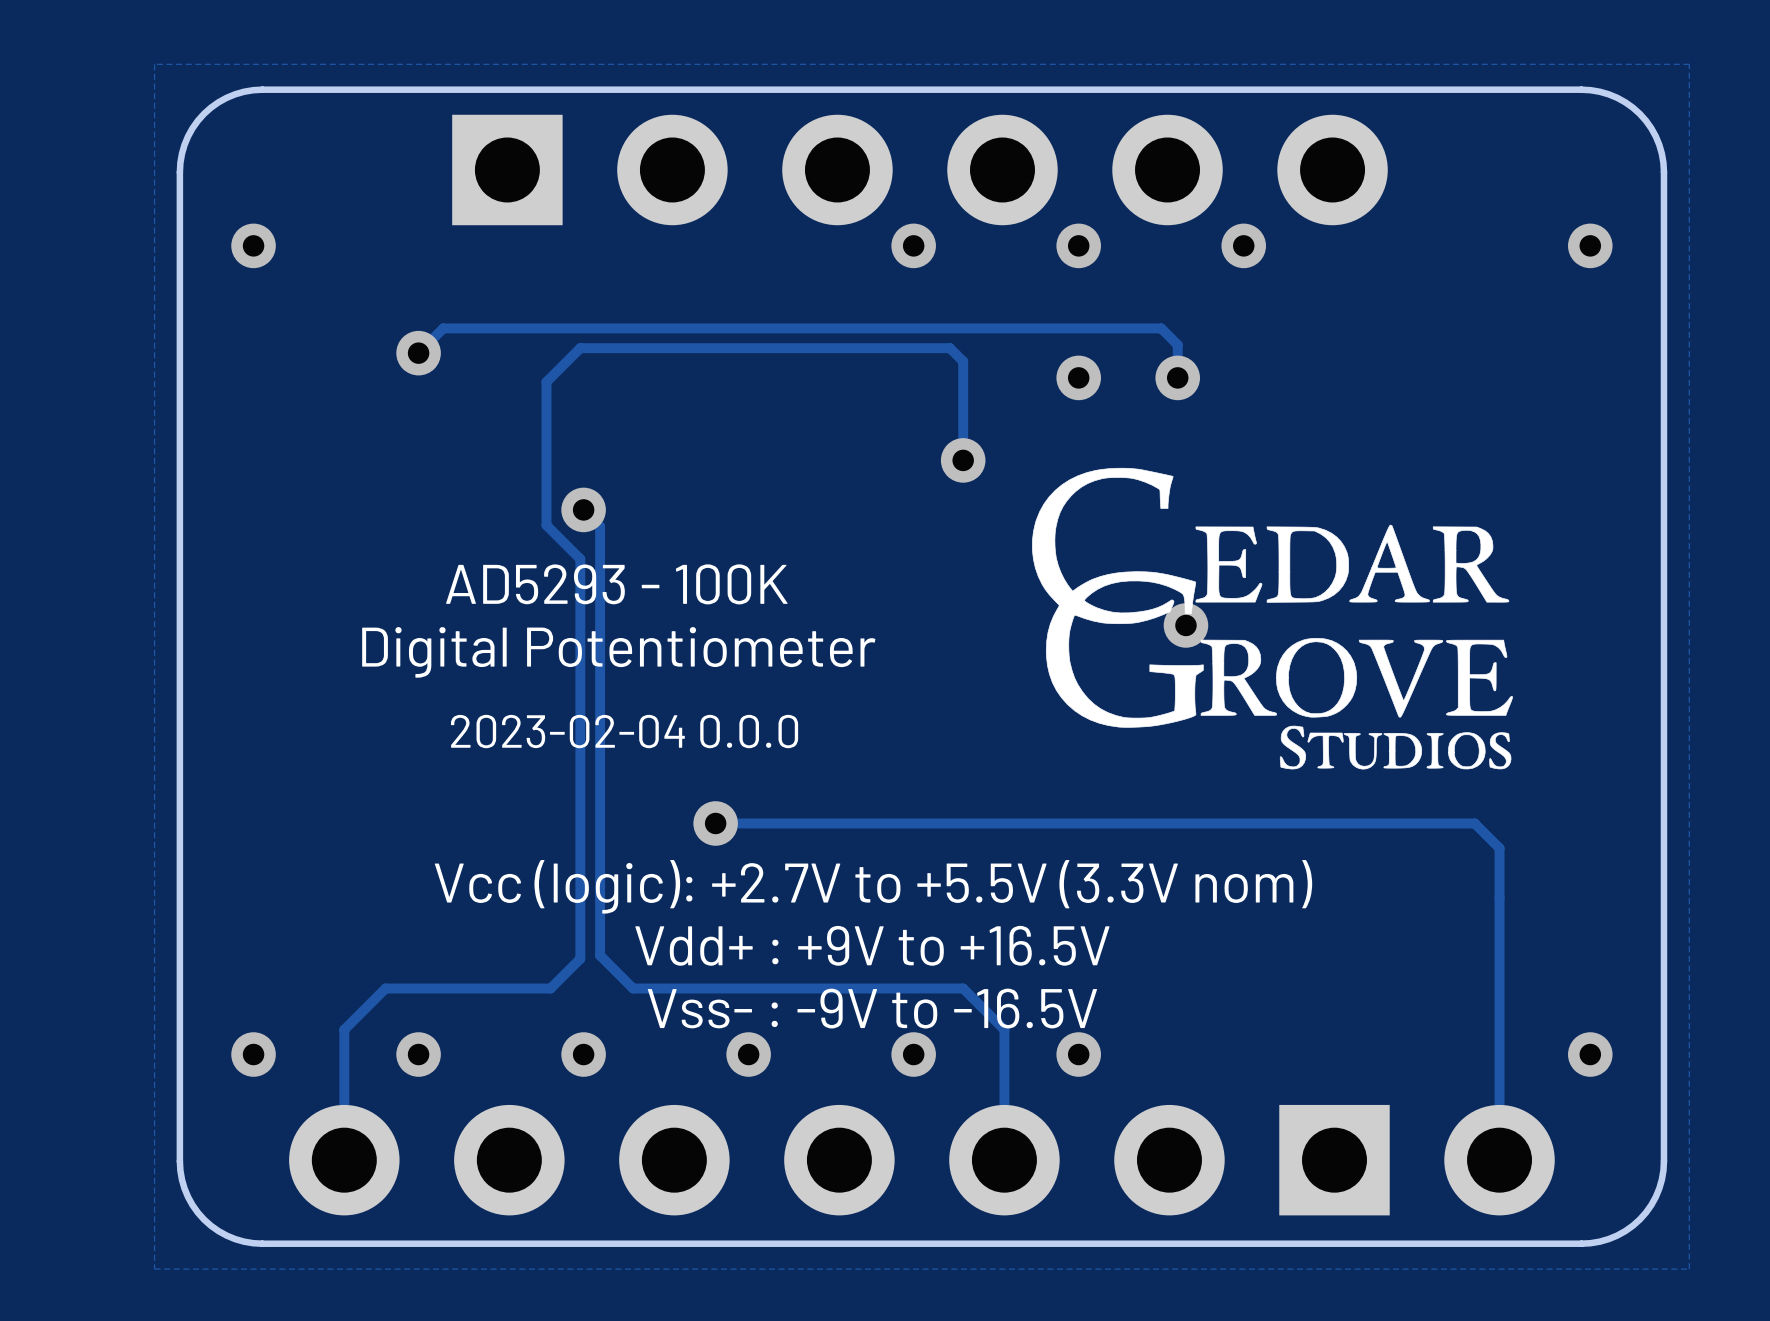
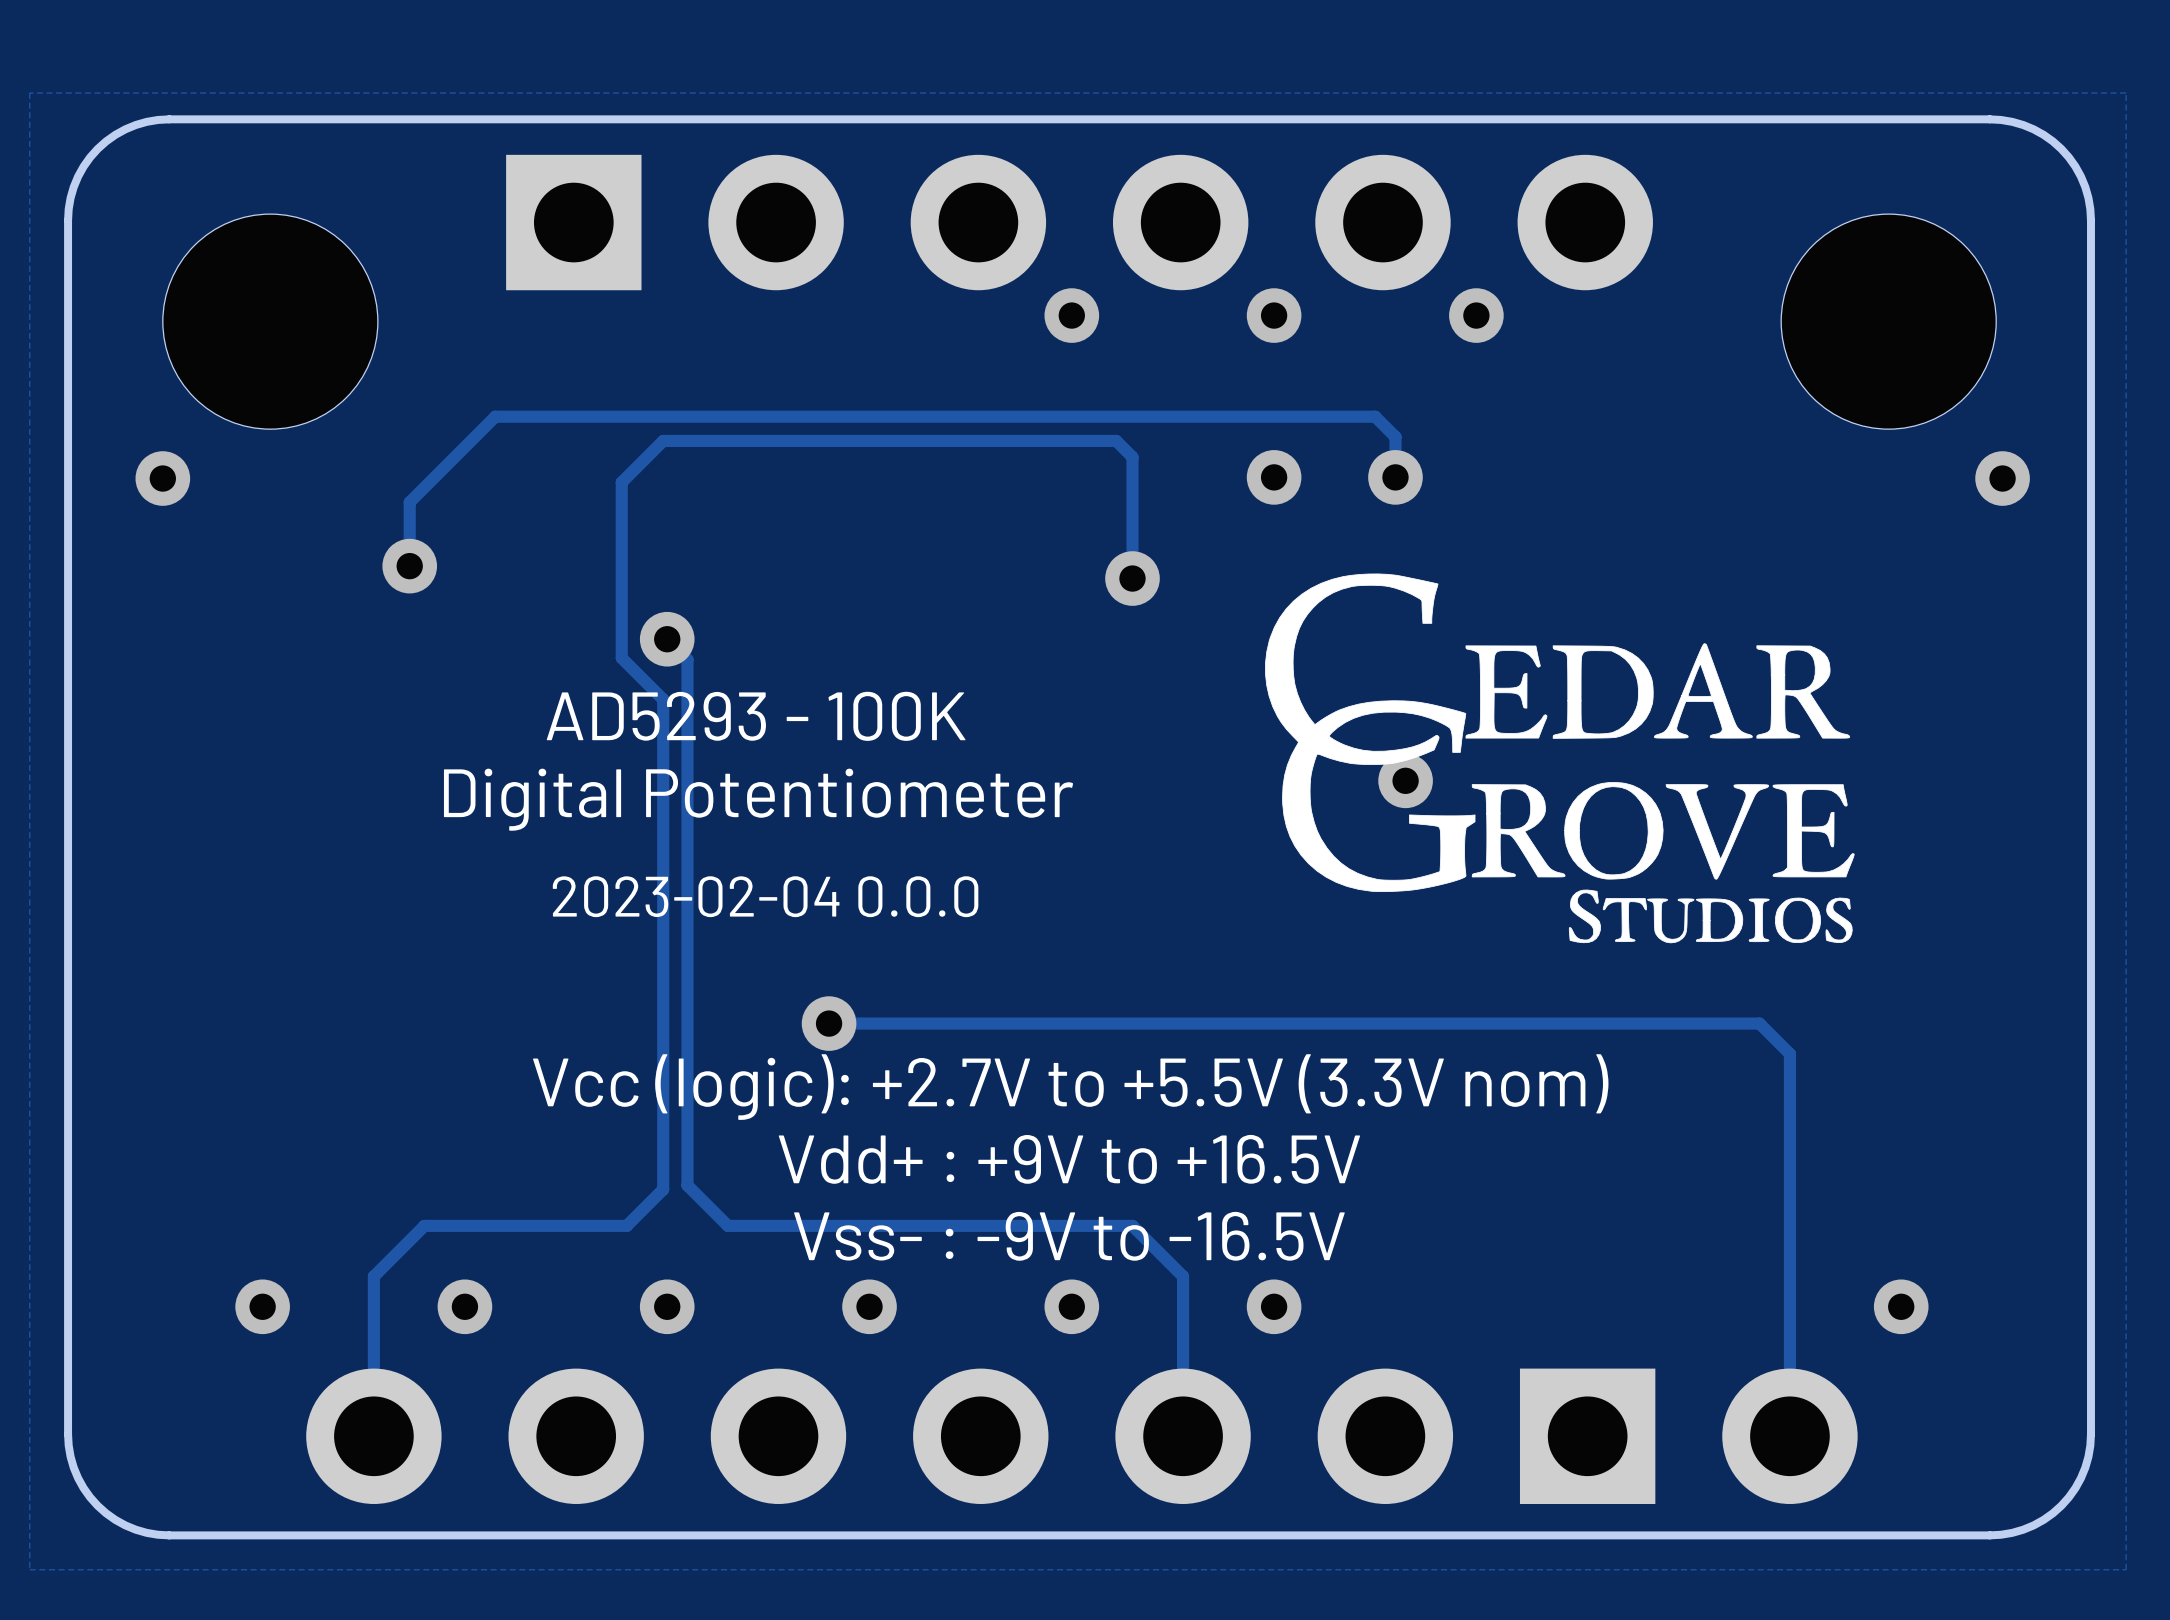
zone outline: (1689, 64) (1689, 1269) (154, 1269) (154, 64) (1689, 64) -> (2126, 93) (2126, 1569) (29, 1569) (29, 93) (2126, 93)
board edge: (1581, 89) (262, 89) (235, 94) (210, 107) (197, 120) (188, 136) (181, 153) (179, 172) (179, 1161) (184, 1188) (197, 1212) (210, 1225) (226, 1235) (244, 1241) (262, 1243) (1581, 1243) (1608, 1239) (1632, 1225) (1645, 1212) (1655, 1197) (1661, 1179) (1663, 1161) (1663, 172) (1661, 153) (1655, 136) (1639, 113) (1625, 102) (1608, 94) (1581, 89) -> (1989, 119) (2012, 121) (2033, 129) (2061, 148) (2075, 166) (2085, 187) (2090, 220) (2090, 1434) (2088, 1456) (2080, 1478) (2068, 1497) (2052, 1513) (2023, 1529) (1989, 1535) (169, 1535) (146, 1532) (125, 1525) (106, 1513) (90, 1497) (73, 1467) (68, 1434) (68, 220) (70, 197) (78, 176) (90, 157) (106, 141) (135, 125) (169, 119) (1989, 119)
part position: (919, 169) -> (1079, 222)
via: (253, 245) -> none
via position: (913, 245) -> (1071, 315)
via position: (1078, 245) -> (1274, 315)
via position: (1243, 245) -> (1476, 315)
via position: (1590, 245) -> (2002, 478)
part: none -> (270, 321)
part: none -> (1888, 321)
track: (418, 353) (443, 328) (1161, 328) (1177, 344) (1177, 377) -> none
via: (418, 353) -> none
via position: (1078, 377) -> (1274, 477)
via position: (1177, 377) -> (1395, 477)
track: none -> (1395, 477) (1395, 436) (1375, 416) (495, 416) (409, 502) (409, 566)
via: none -> (162, 478)
track: (963, 460) (963, 361) (949, 348) (580, 348) (546, 382) (546, 525) (580, 559) (580, 958) (550, 988) (385, 988) (344, 1029) (344, 1160) -> (1132, 578) (1132, 457) (1116, 440) (663, 440) (621, 482) (621, 658) (663, 699) (663, 1189) (626, 1225) (424, 1225) (373, 1276) (373, 1436)
via position: (963, 460) -> (1132, 578)
via: none -> (409, 566)
track: (583, 509) (600, 526) (600, 955) (633, 988) (963, 988) (1004, 1029) (1004, 1160) -> (667, 639) (687, 659) (687, 1185) (727, 1225) (1132, 1225) (1183, 1276) (1183, 1436)
via position: (583, 509) -> (667, 639)
via position: (1185, 625) -> (1405, 780)
track: (715, 823) (1474, 823) (1499, 848) (1499, 1160) -> (829, 1023) (1759, 1023) (1789, 1053) (1789, 1436)
via position: (715, 823) -> (829, 1023)
via position: (253, 1054) -> (262, 1306)
via position: (418, 1054) -> (464, 1306)
via position: (583, 1054) -> (667, 1306)
via position: (748, 1054) -> (869, 1306)
via position: (913, 1054) -> (1071, 1306)
via position: (1078, 1054) -> (1274, 1306)
via position: (1590, 1054) -> (1901, 1306)
part position: (921, 1160) -> (1081, 1436)

